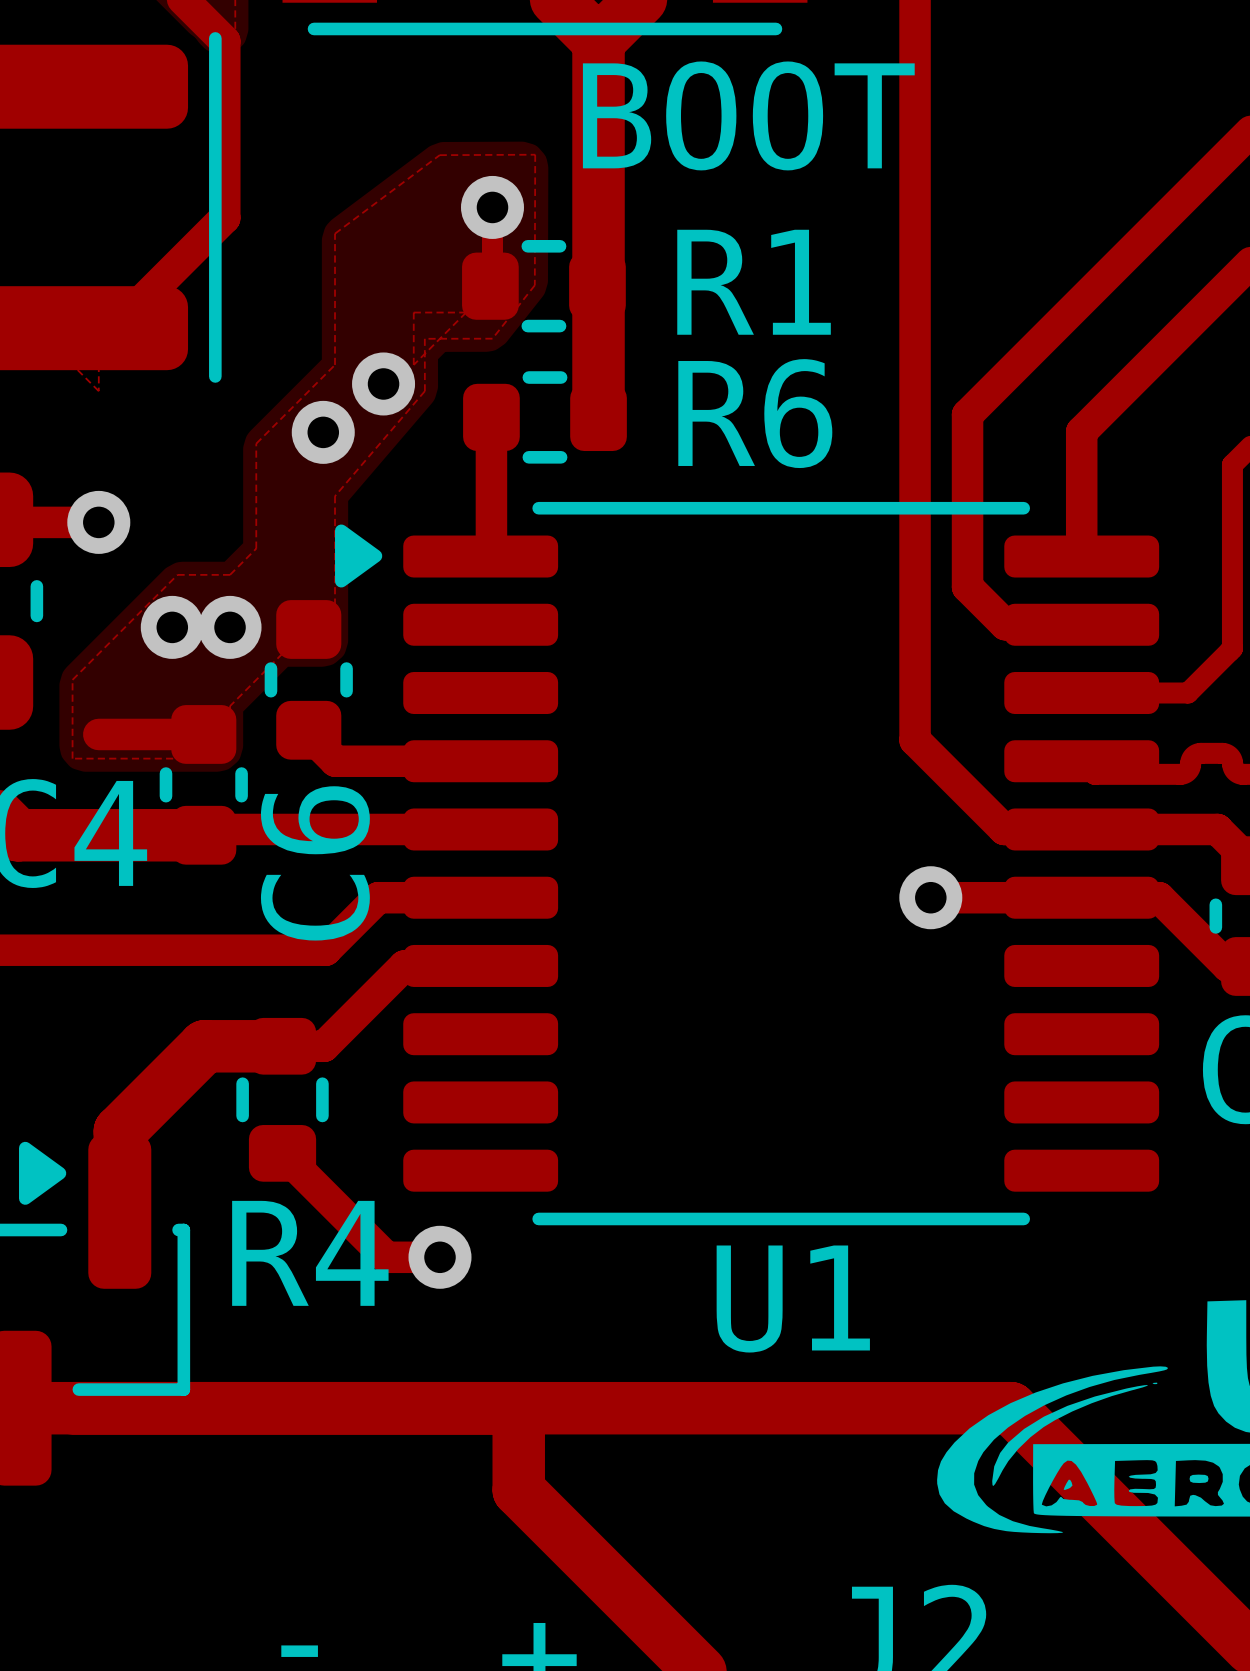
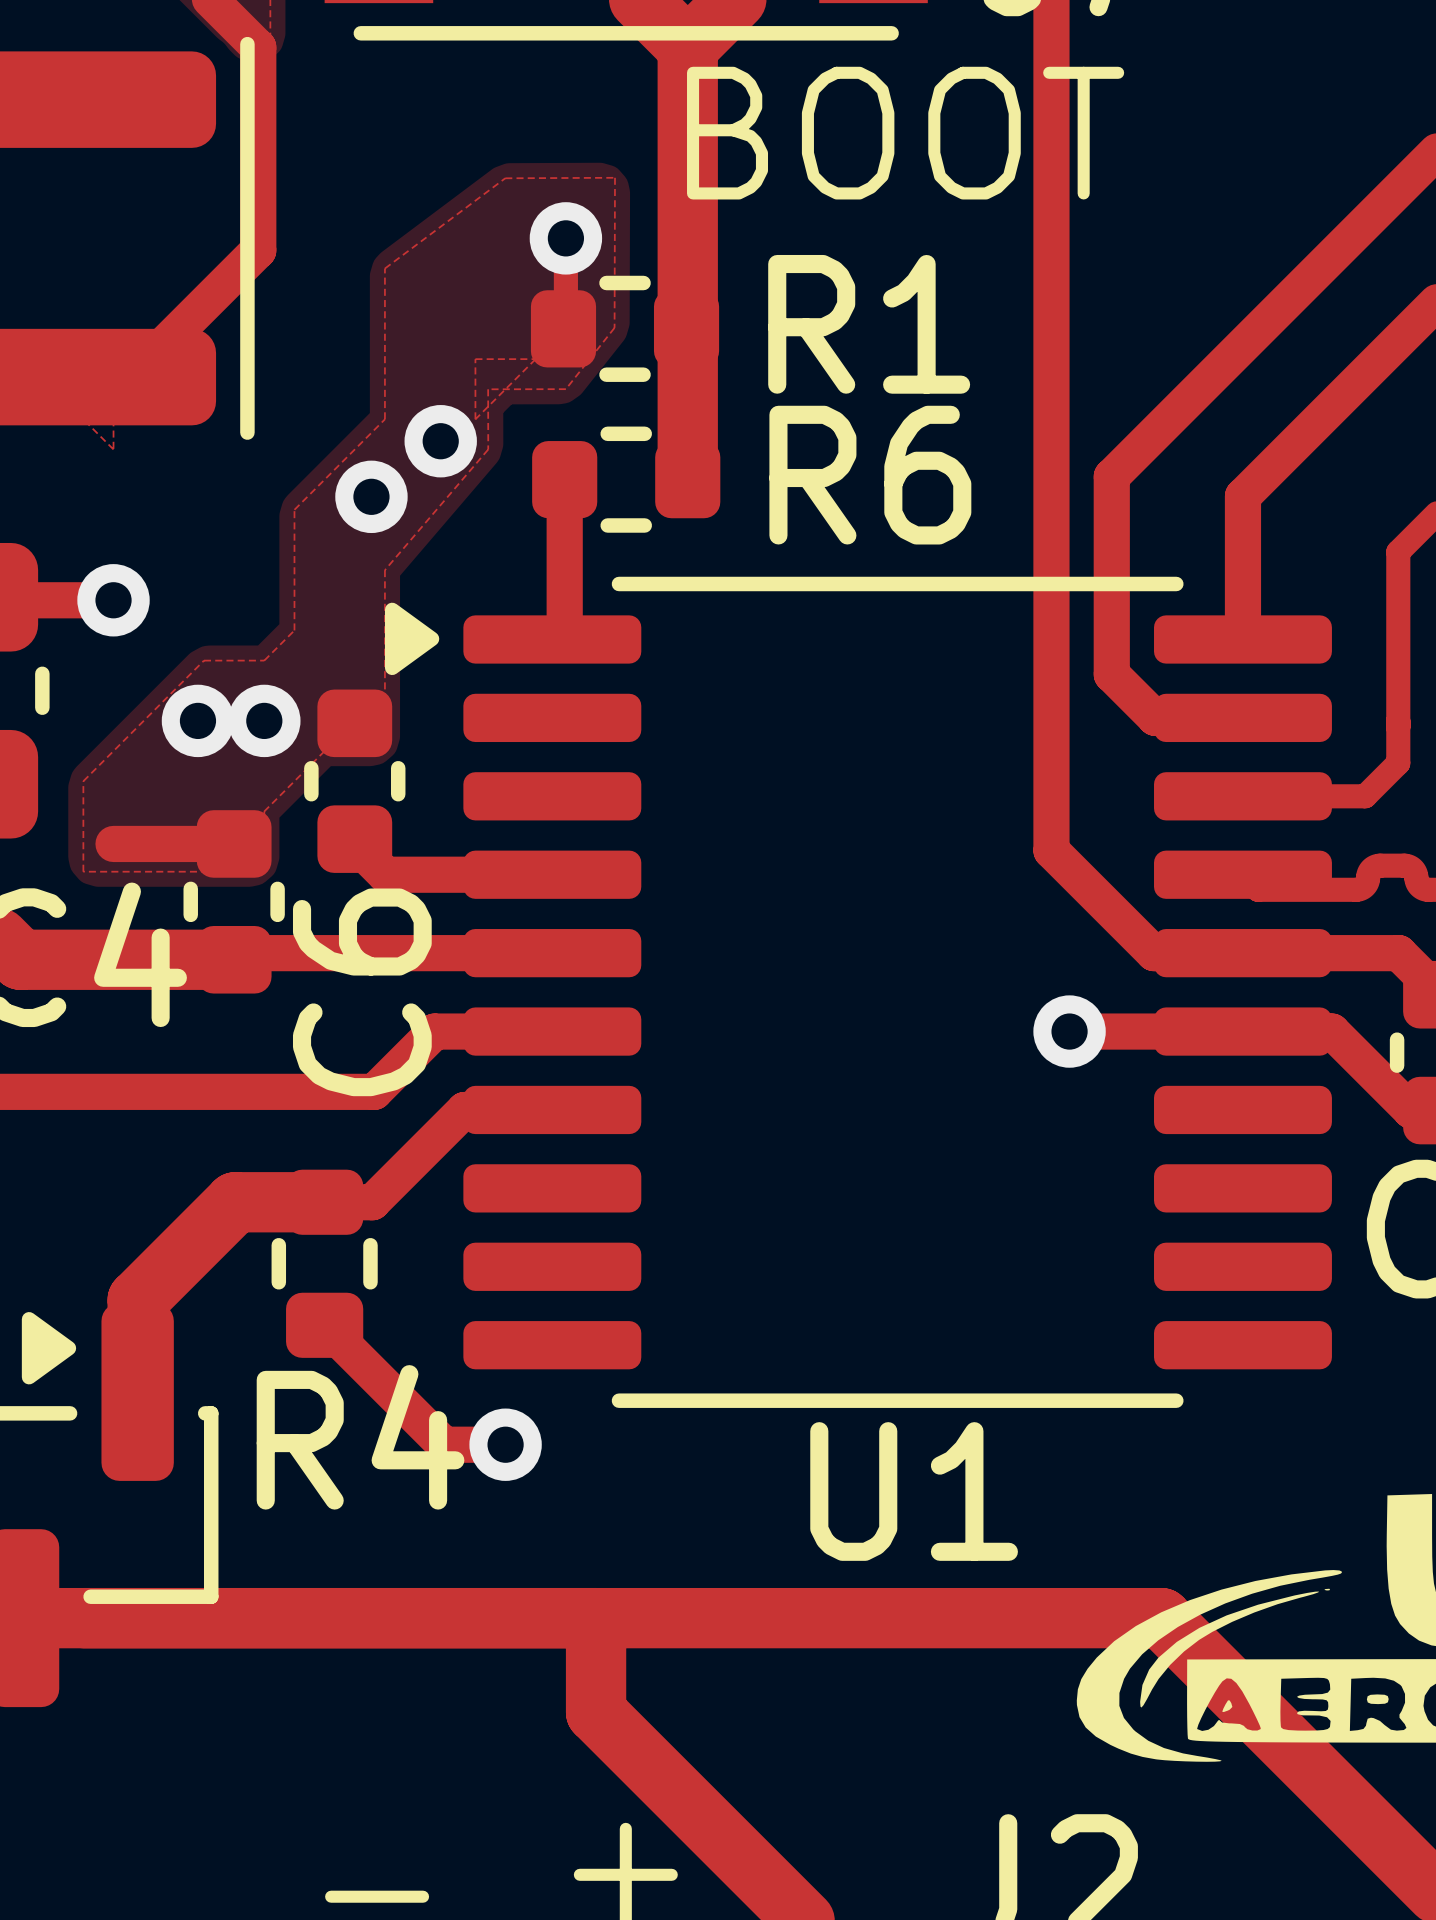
track: (1232, 464) (1232, 648) (1216, 664) -> (1416, 534) (1398, 552) (1398, 763)

